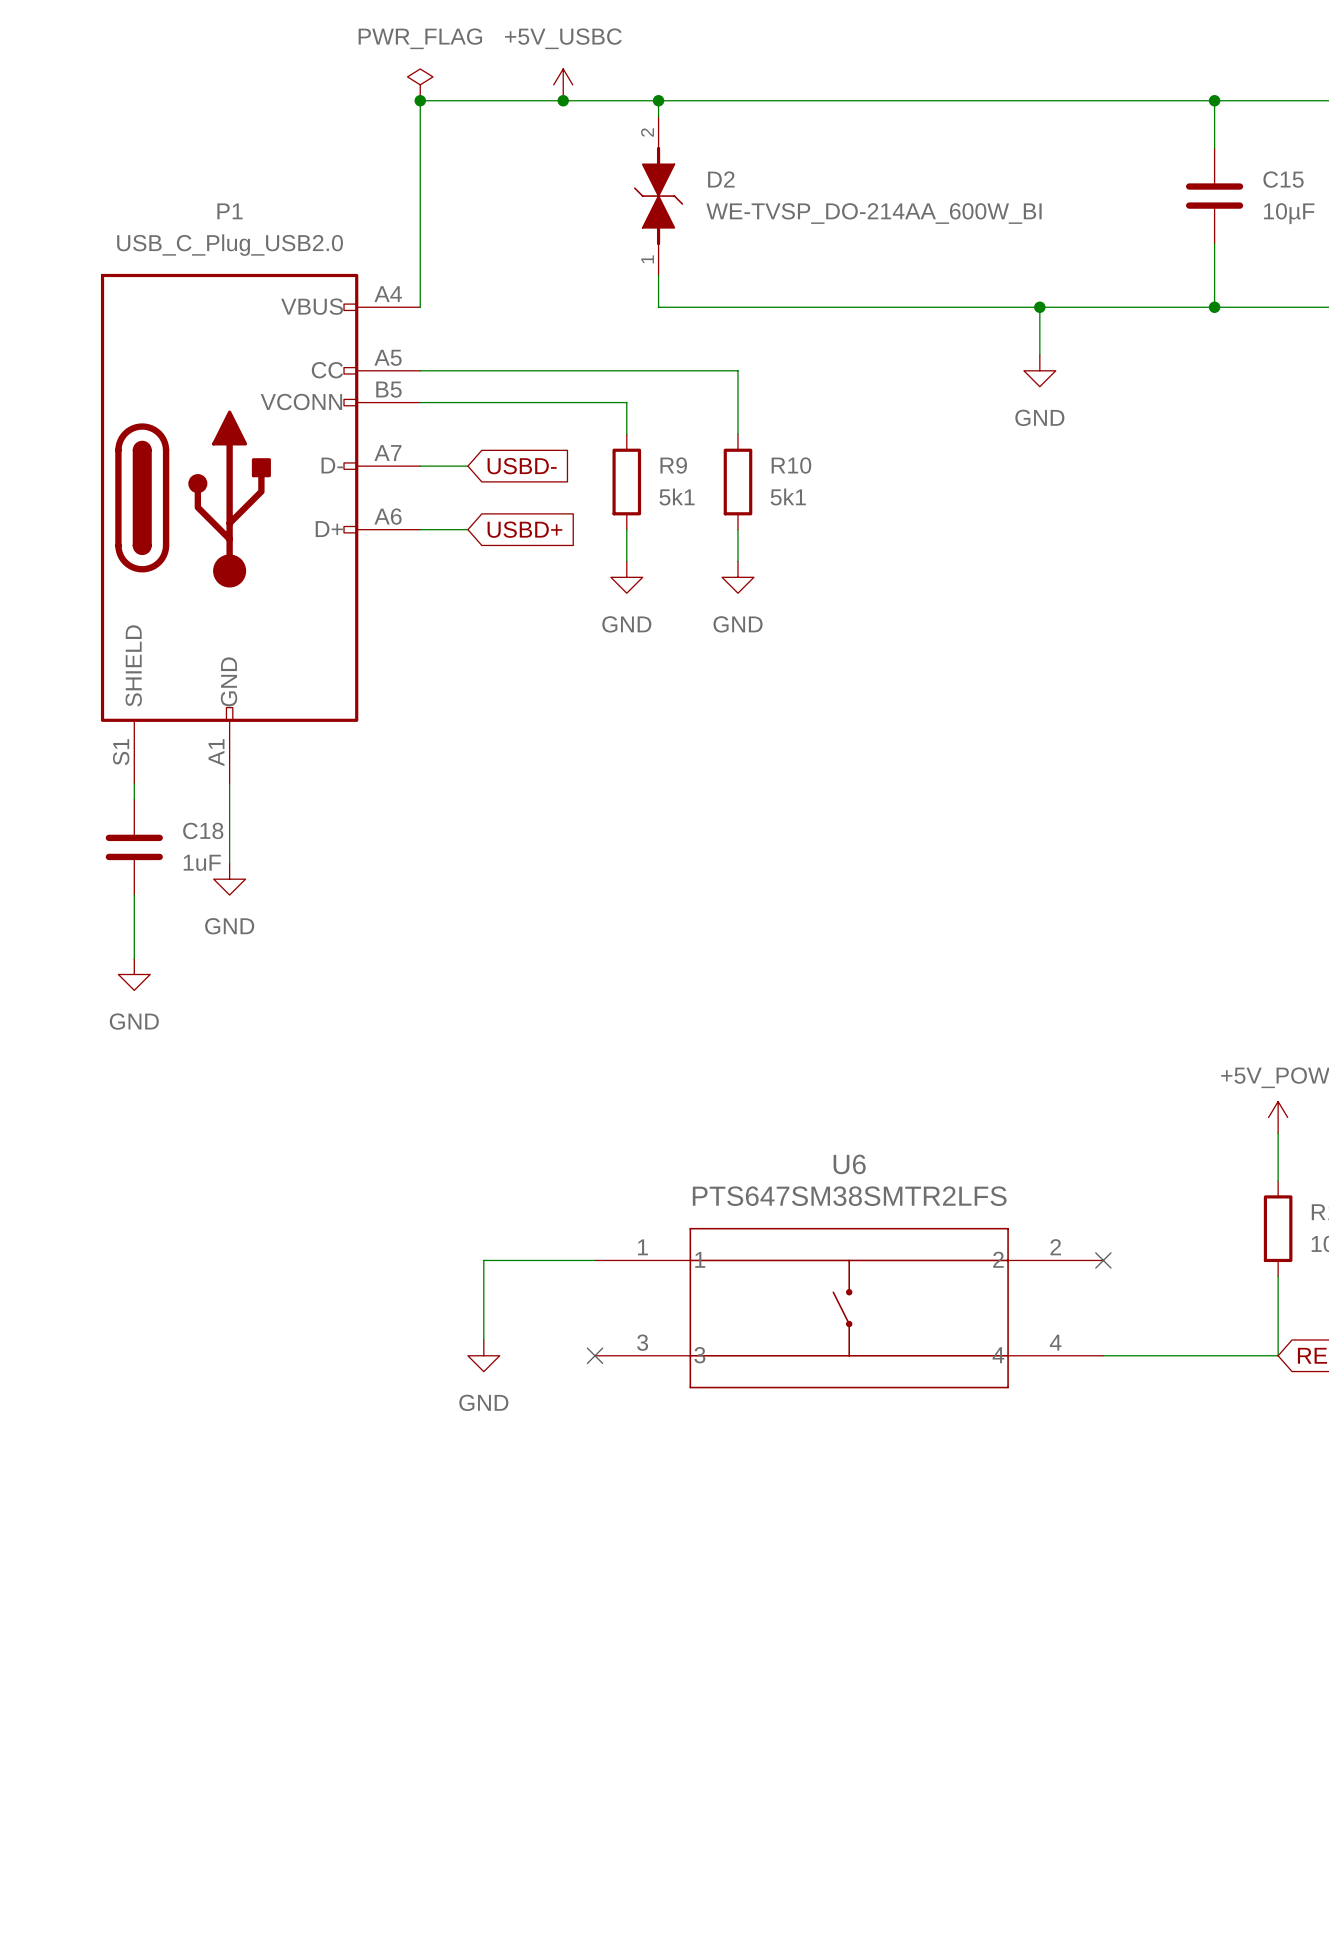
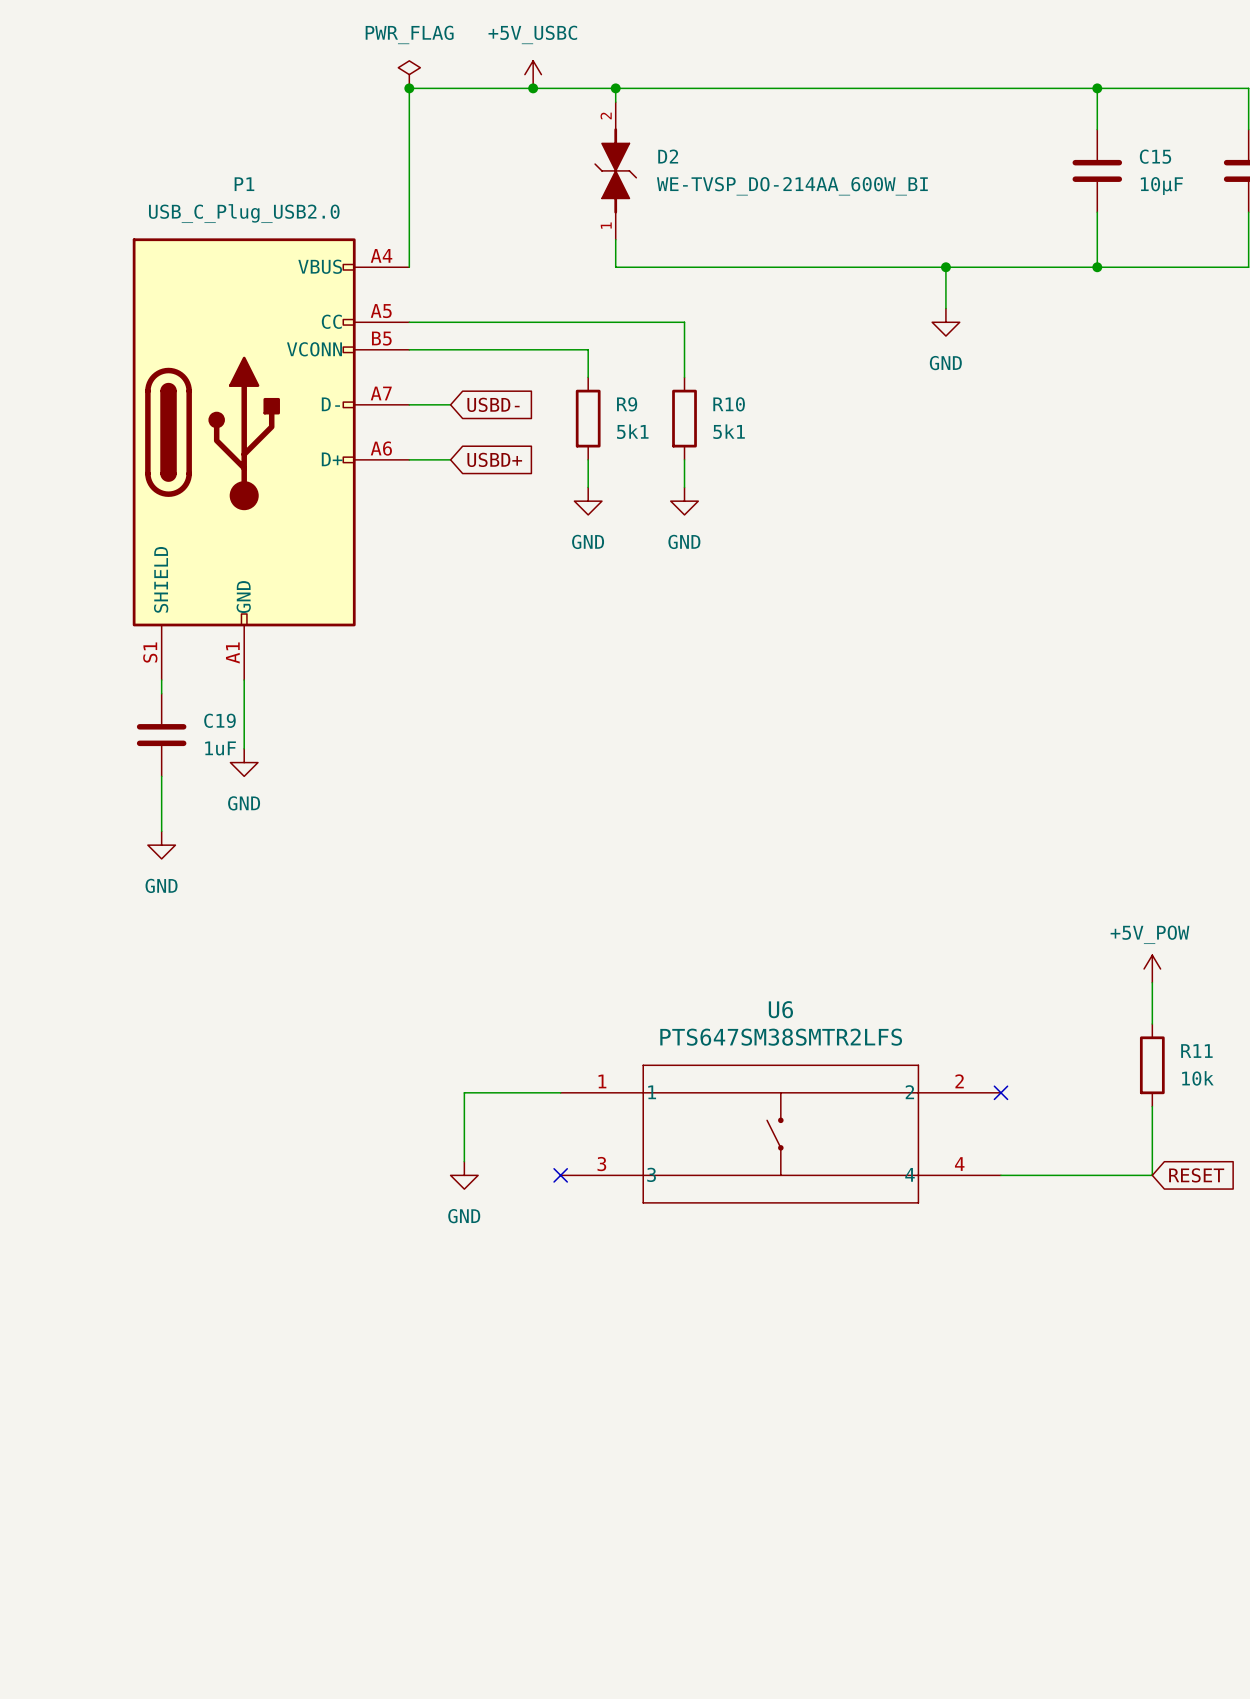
C18 name: C18 (203, 830) -> C19 (219, 720)

